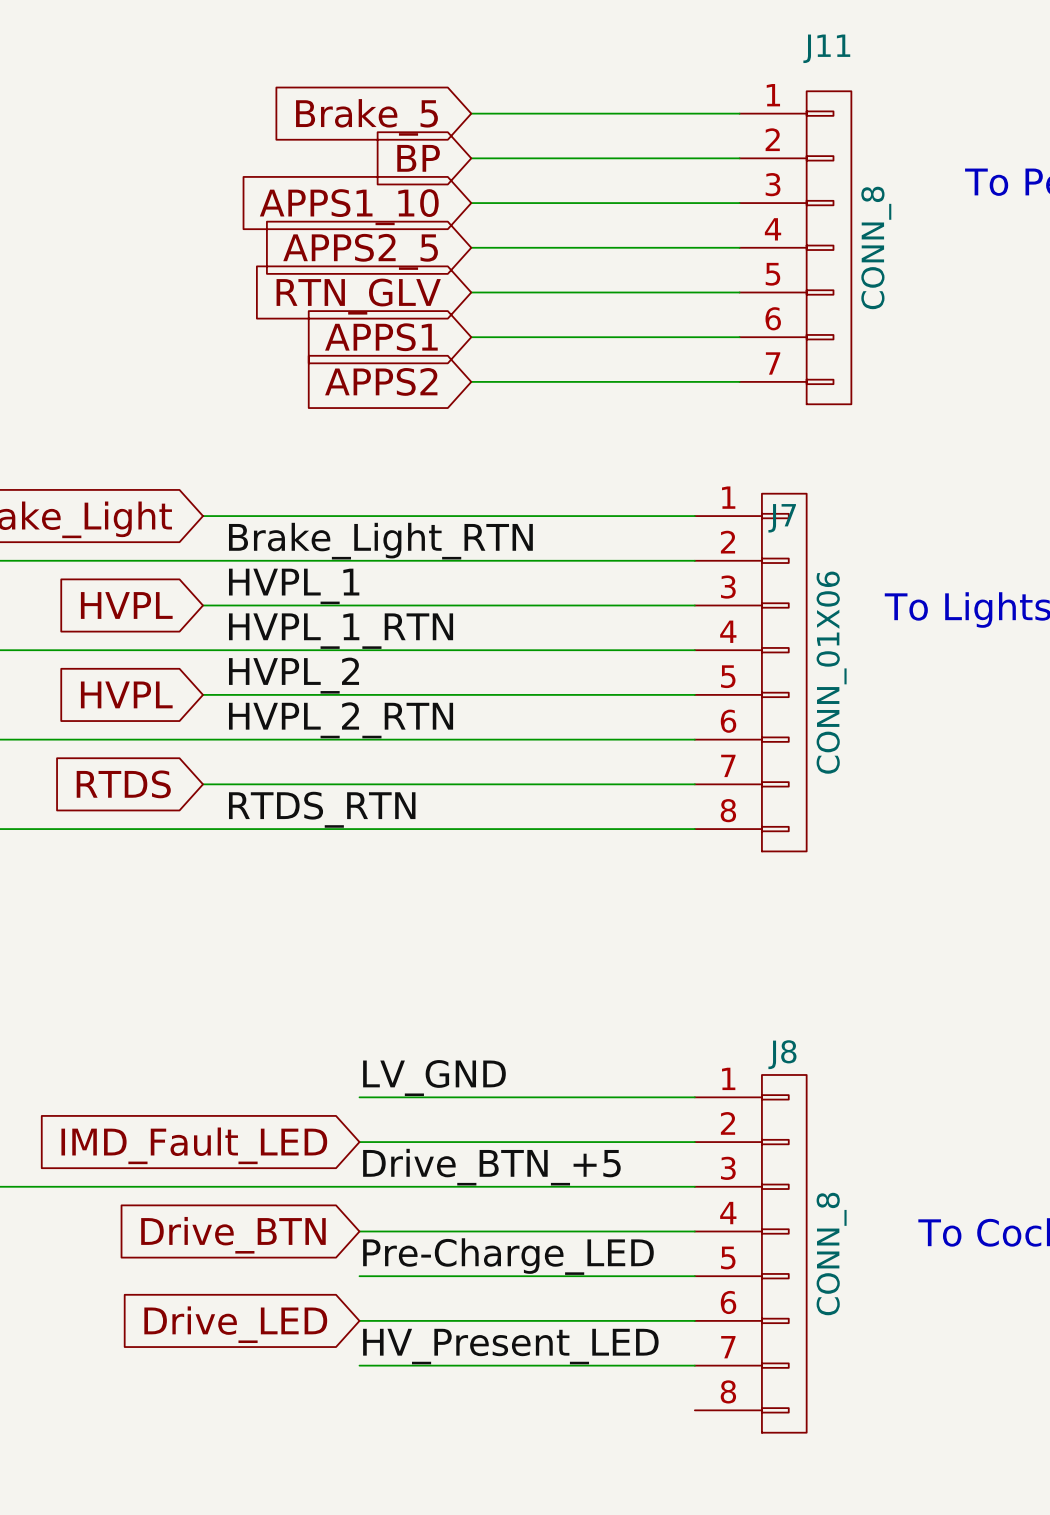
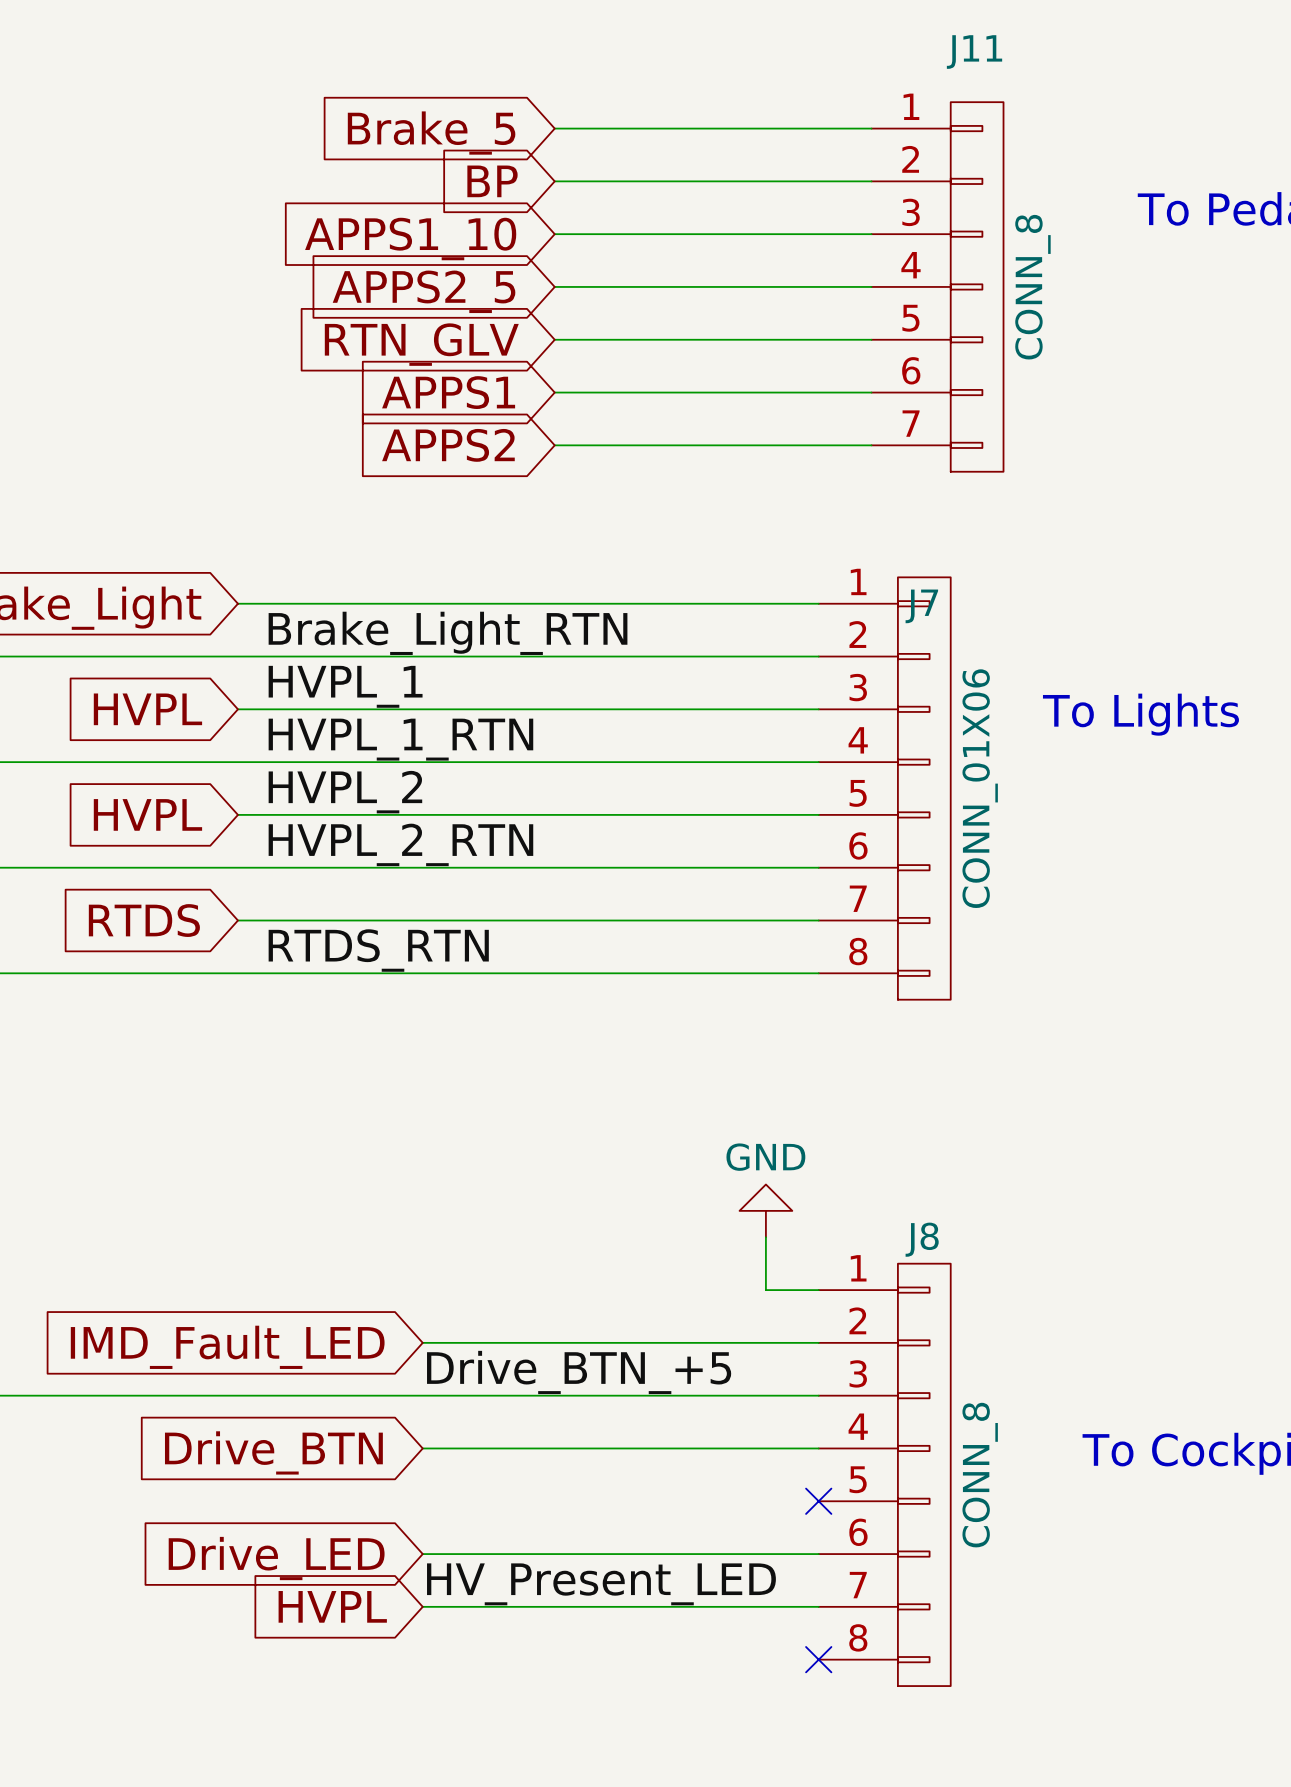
power symbol: none -> GND (765, 1210)
label: LV_GND (434, 1078) -> none
wire: (359, 1097) (650, 1097) -> (765, 1237) (765, 1290)
label: Pre-Charge_LED (508, 1256) -> none
wire: (359, 1276) (694, 1276) -> none
no-connect mark: none -> (818, 1501)
global label: none -> HVPL (332, 1606)
no-connect mark: none -> (818, 1659)

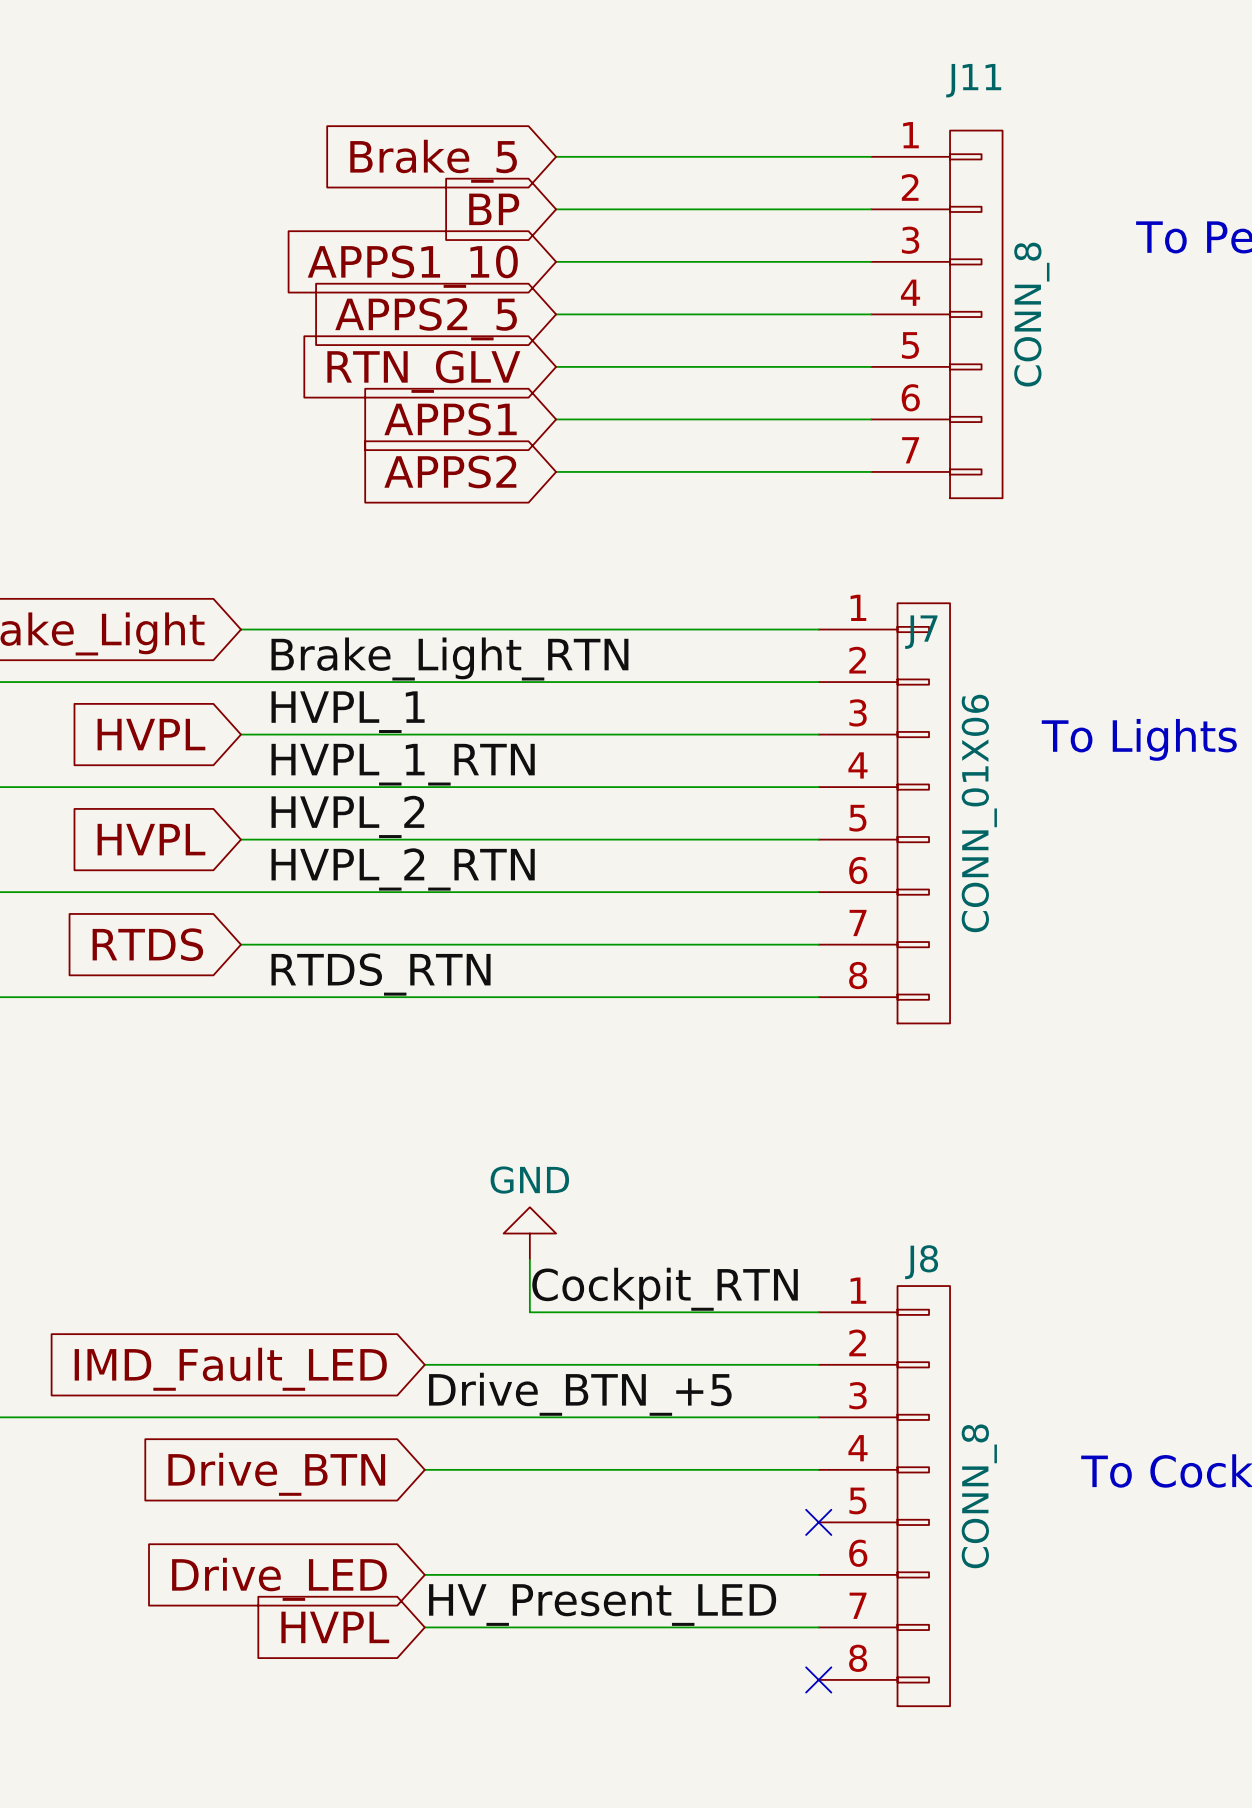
power symbol position: GND (765, 1210) -> GND (529, 1233)
wire: (765, 1237) (765, 1290) -> (529, 1259) (529, 1312) (766, 1312)
label: none -> Cockpit_RTN (665, 1289)

